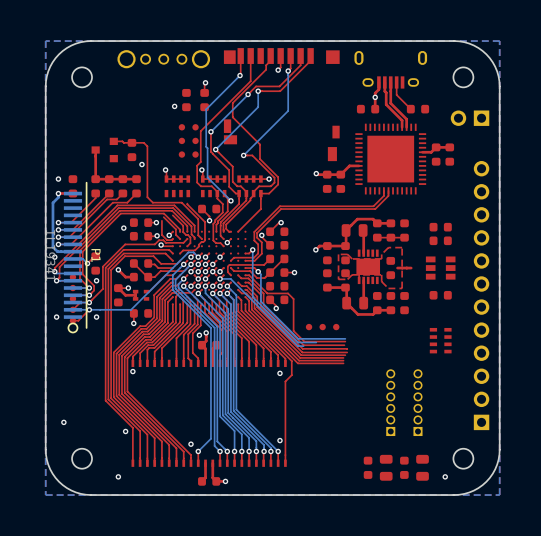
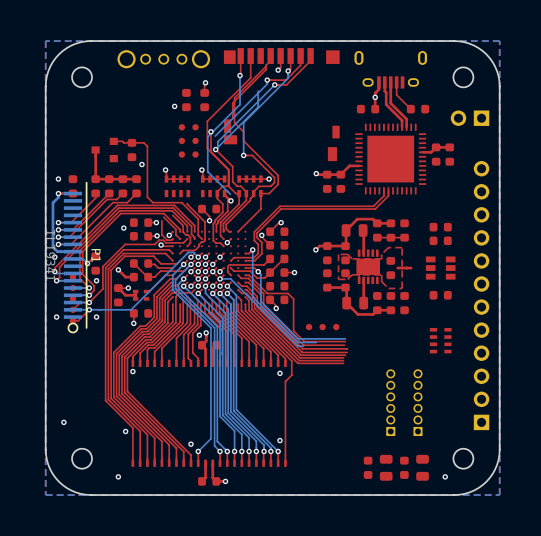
bottom track: (240, 75) (206, 109) (207, 177) (230, 200) -> (240, 75) (240, 104) (207, 136) (207, 171) (230, 194)
top track: (250, 77) (250, 81) (200, 131) (200, 162) (197, 165) (197, 182) (200, 186) (211, 186) (217, 191) -> (250, 77) (207, 121) (207, 148) (228, 169) (228, 185) (222, 186) (217, 191)
bottom track: (288, 78) (288, 110) (243, 155) -> (288, 78) (243, 122) (243, 155)
bottom track: none -> (267, 80) (267, 84) (215, 136)
via: none -> (267, 80)
top track: (285, 80) (279, 86) (256, 86) (248, 94) -> (285, 80) (267, 80)
bottom track: none -> (274, 84) (217, 141) (217, 148)
via: none -> (274, 84)
top track: (286, 84) (280, 91) (258, 91) -> (286, 84) (274, 84)
via: (258, 91) -> none
bottom track: (248, 94) (210, 131) -> none
via: (248, 94) -> none
top track: (232, 117) (260, 144) (260, 159) (278, 177) -> (266, 66) (234, 97) (234, 122) (243, 131) (243, 140) (278, 177)

